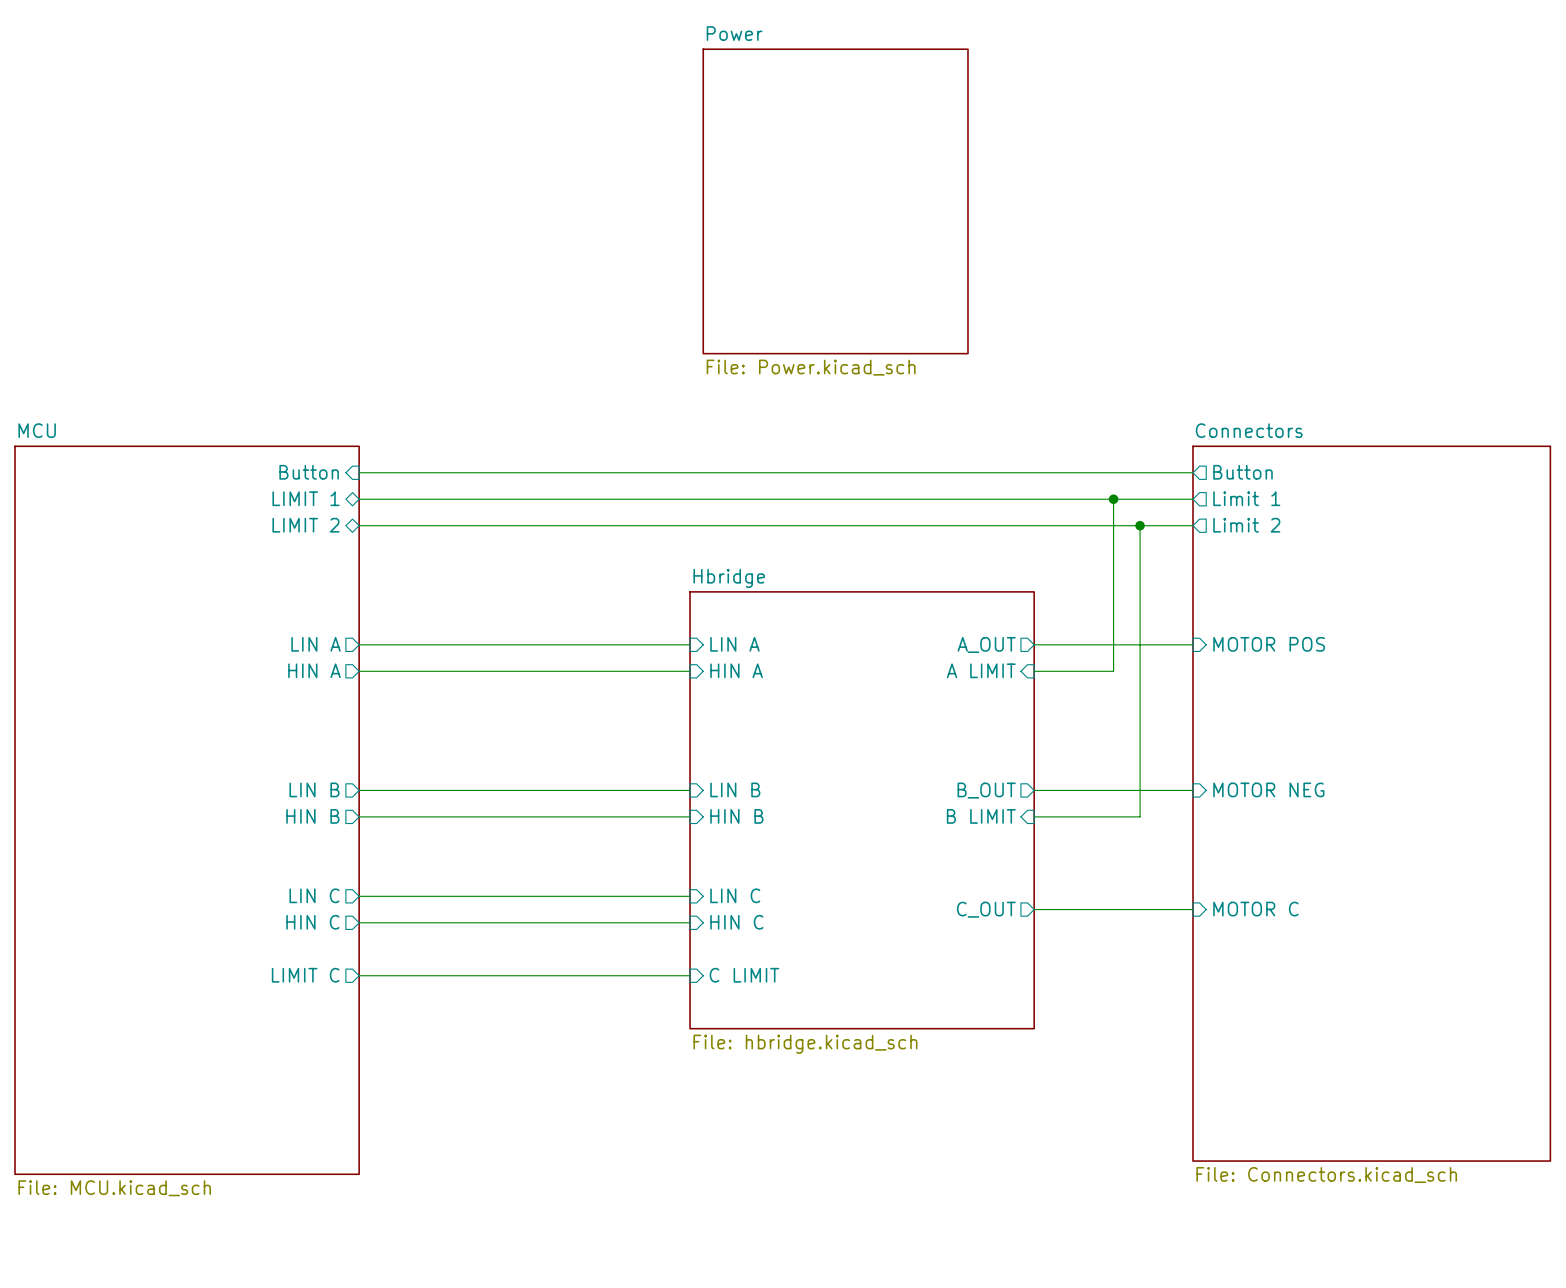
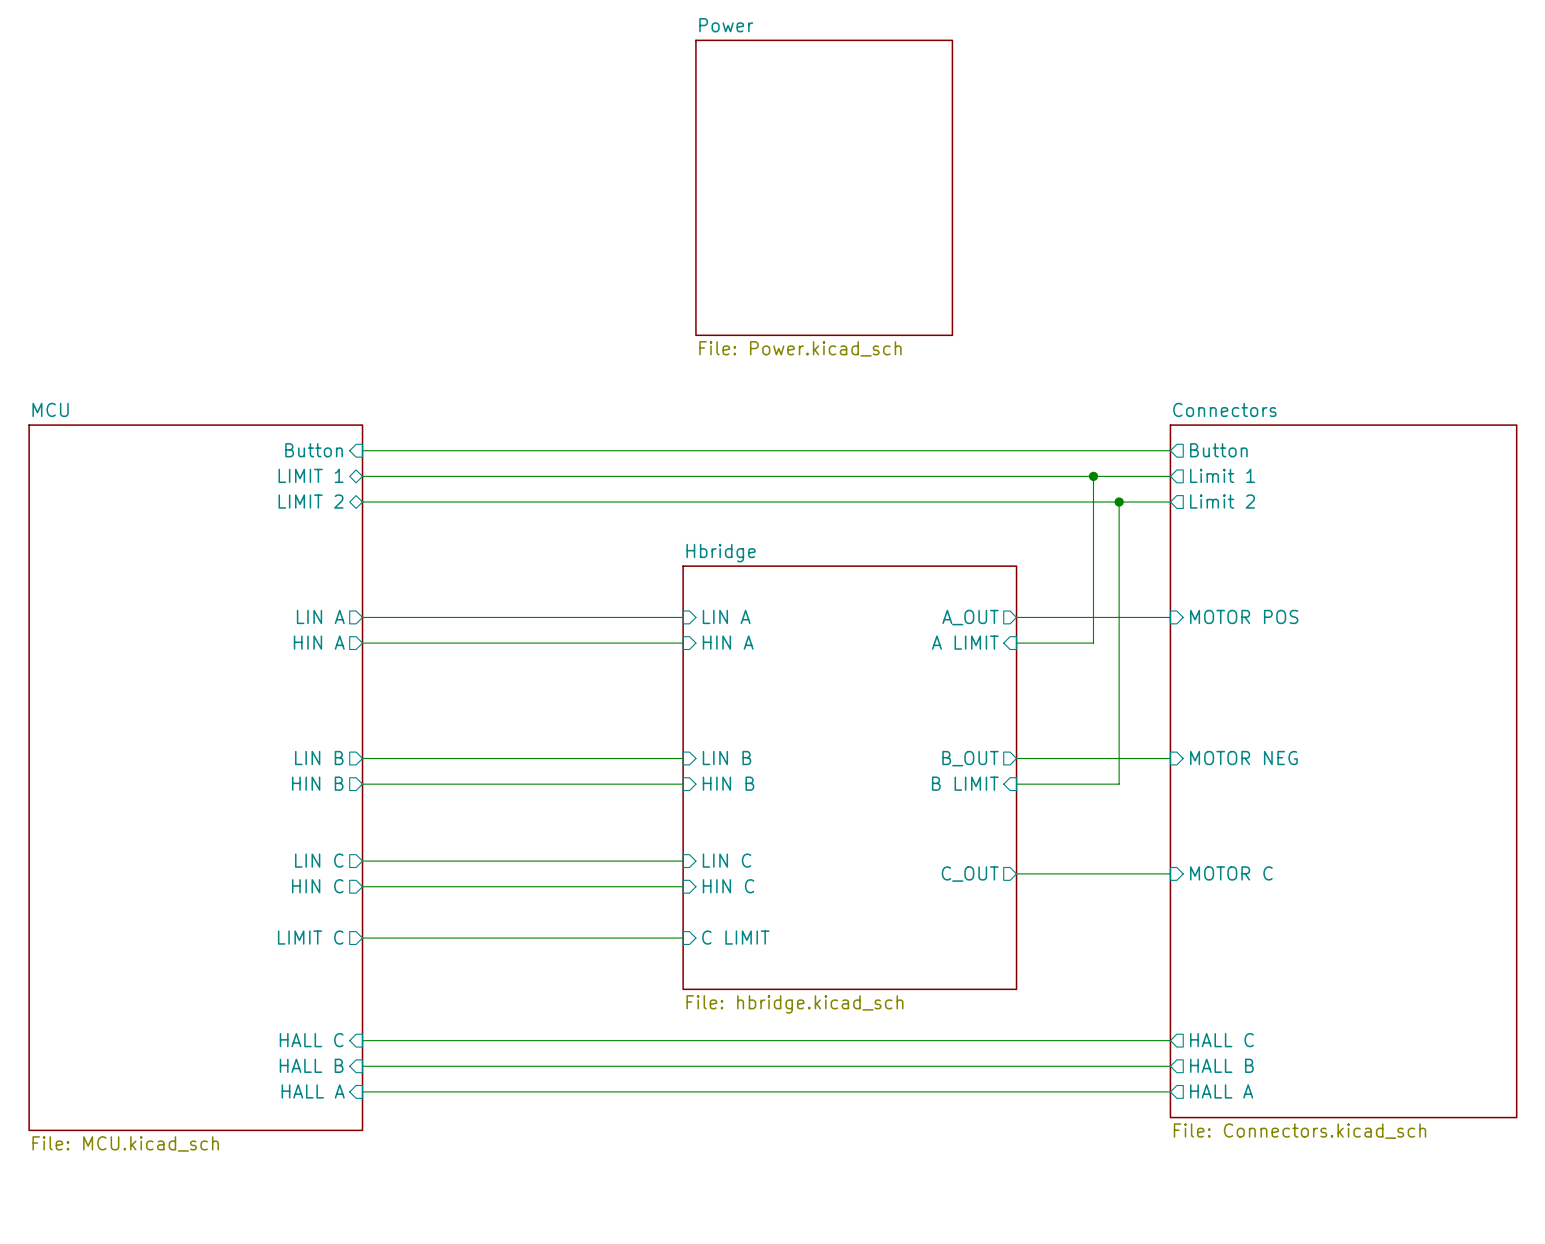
sheet pin: none -> HALL C (311, 1040)
wire: none -> (362, 1040) (1170, 1040)
sheet pin: none -> HALL C (1221, 1040)
sheet pin: none -> HALL B (311, 1065)
sheet pin: none -> HALL B (1221, 1065)
wire: none -> (362, 1066) (1170, 1066)
sheet pin: none -> HALL A (313, 1091)
wire: none -> (362, 1091) (1170, 1091)
sheet pin: none -> HALL A (1221, 1091)

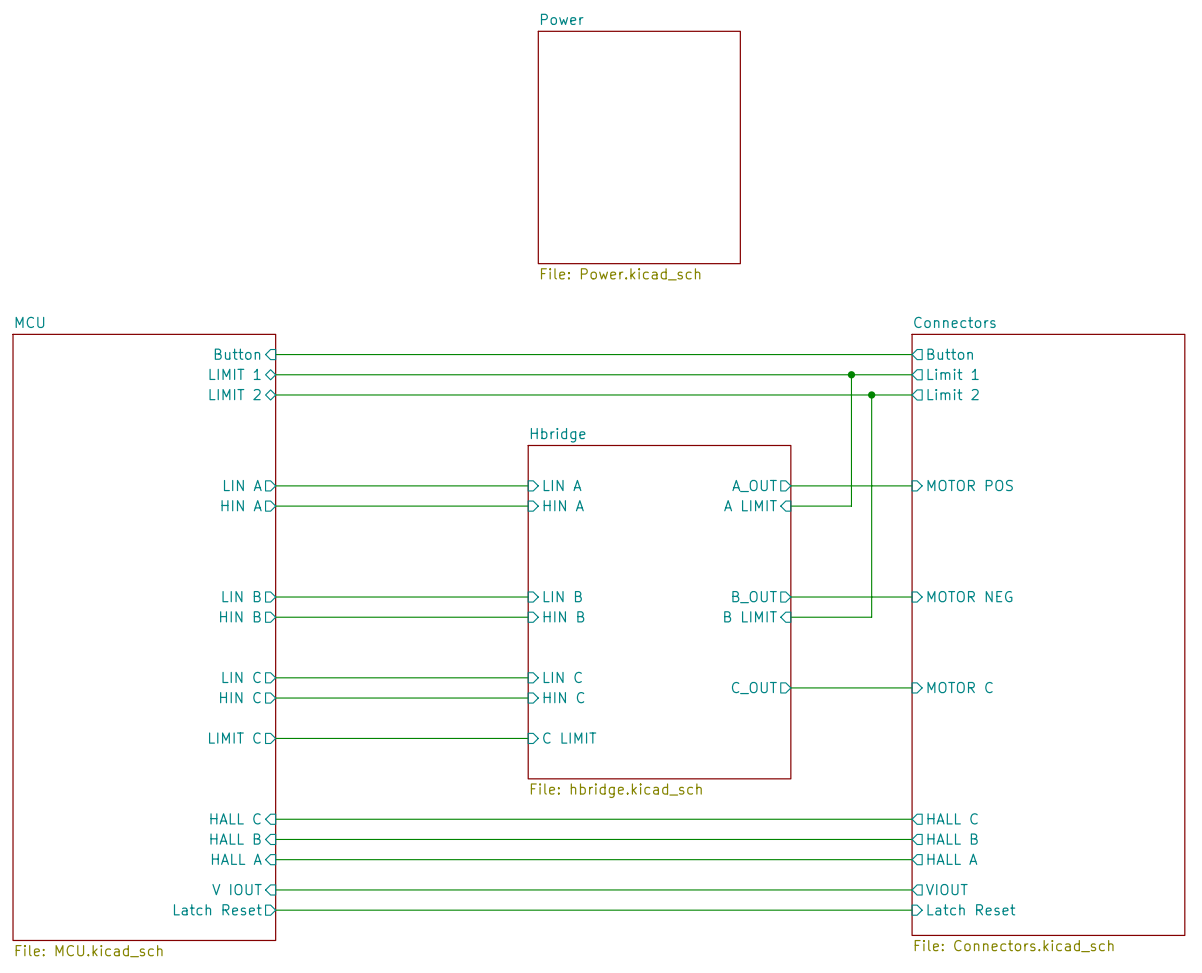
sheet Connectors: File: Connectors.kicad_sch (1343, 771) -> none
sheet MCU: File: MCU.kicad_sch (195, 777) -> none
sheet Connectors: none -> File: Connectors.kicad_sch (1048, 634)
sheet MCU: none -> File: MCU.kicad_sch (144, 637)
sheet pin: none -> V IOUT (237, 889)
sheet pin: none -> VIOUT (946, 889)
wire: none -> (275, 889) (912, 889)
sheet pin: none -> Latch Reset (217, 909)
sheet pin: none -> Latch Reset (971, 909)
wire: none -> (275, 910) (912, 910)

